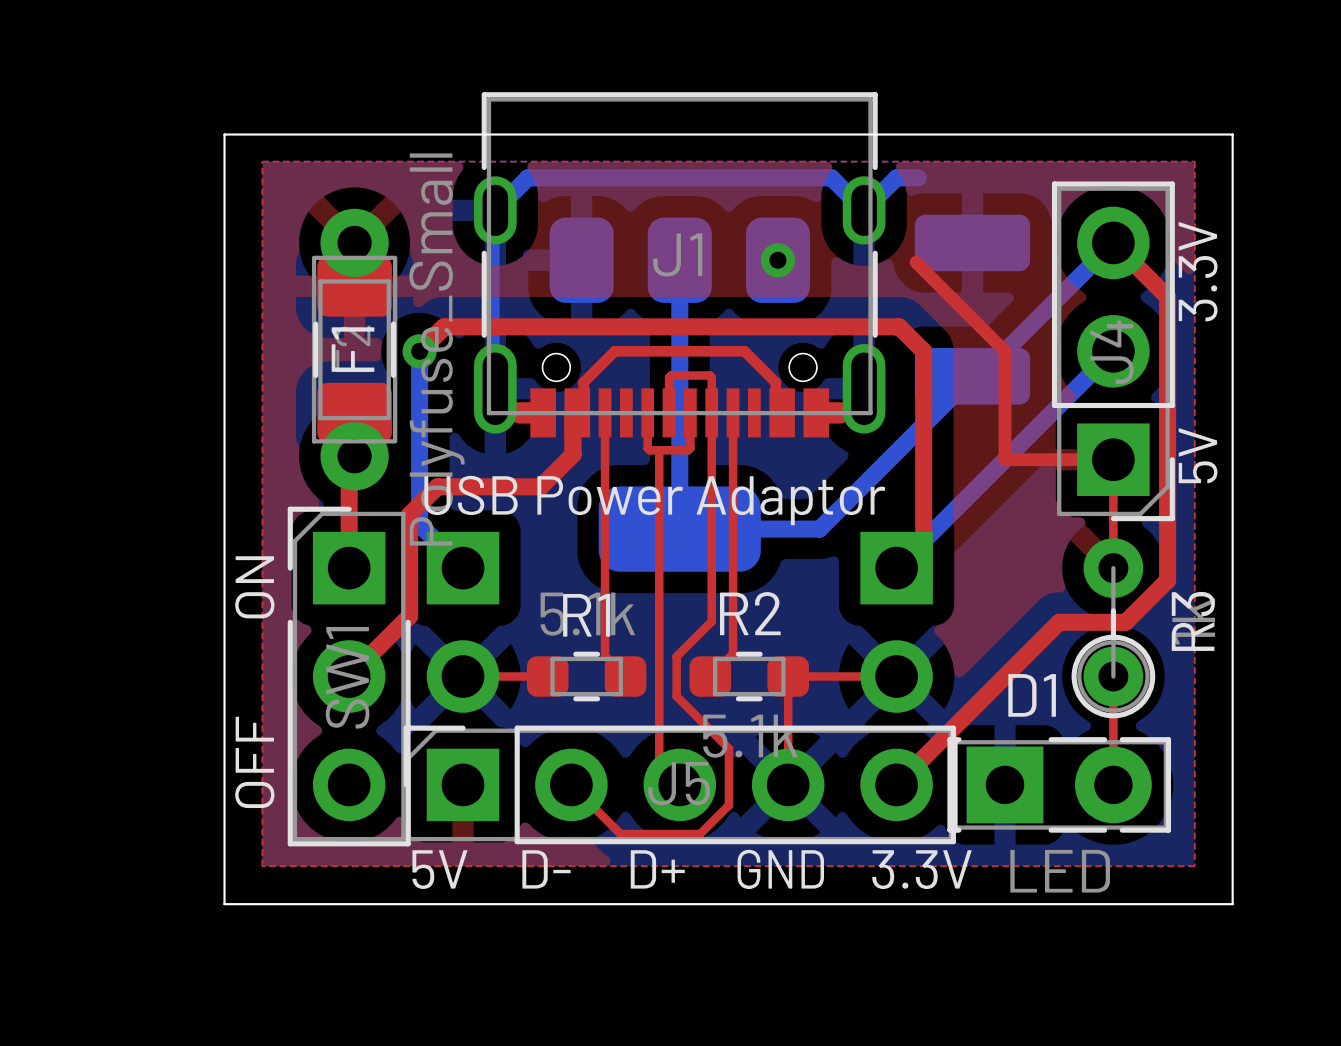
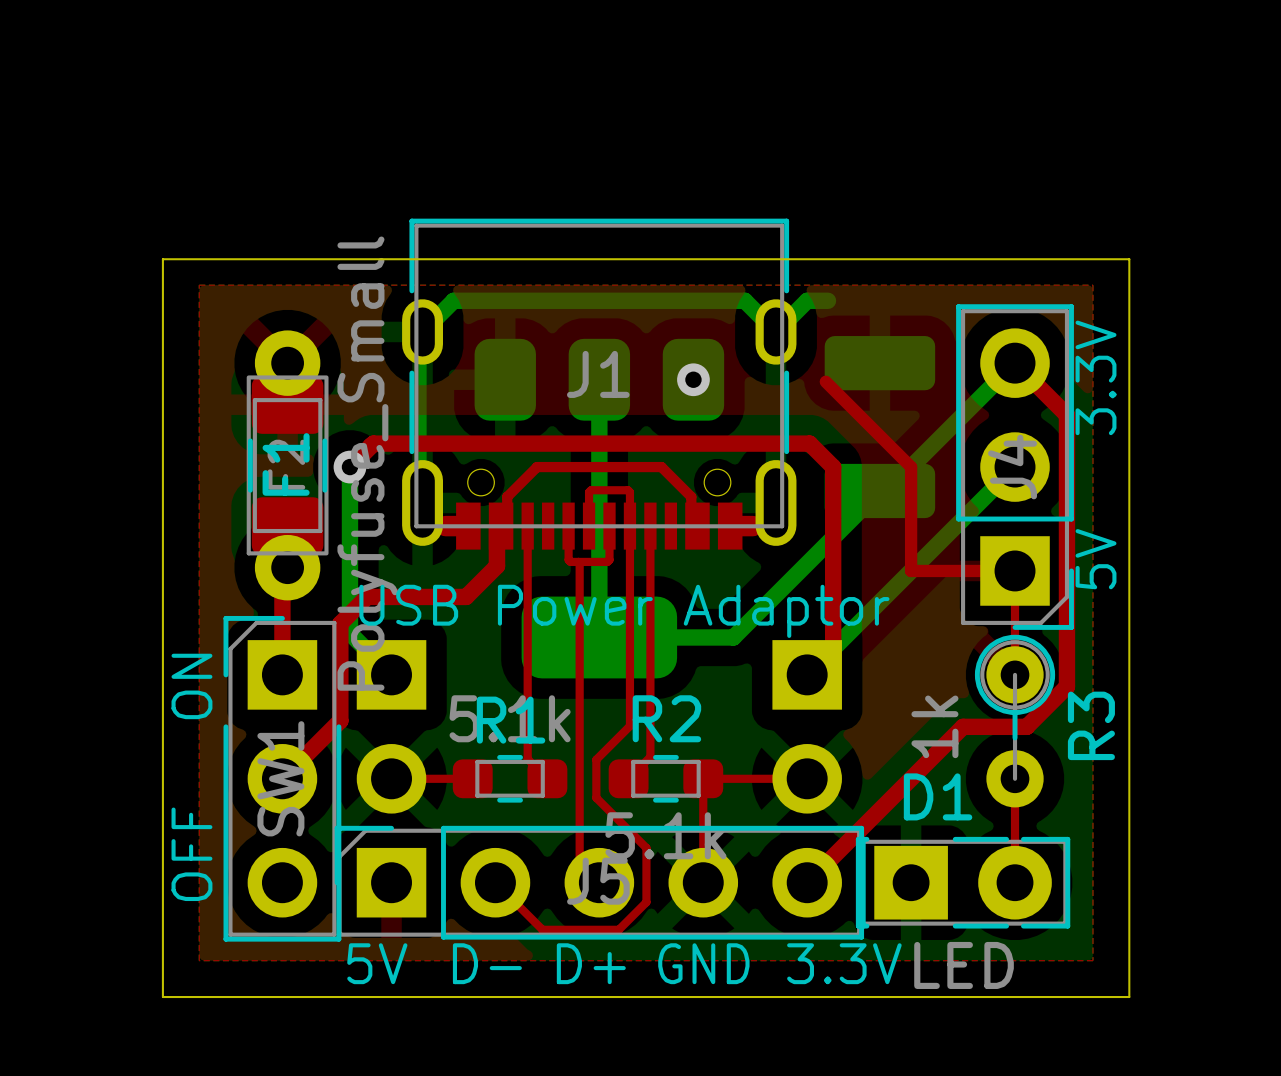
R3 rotation: 0° (1113, 628) -> 180° (1015, 721)

